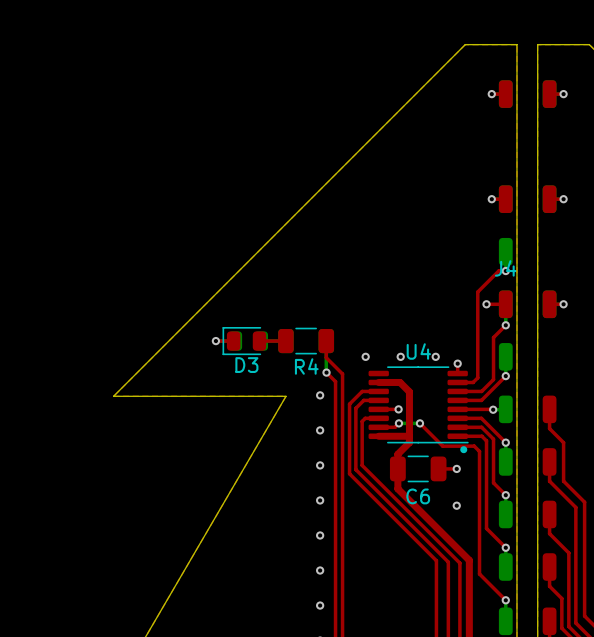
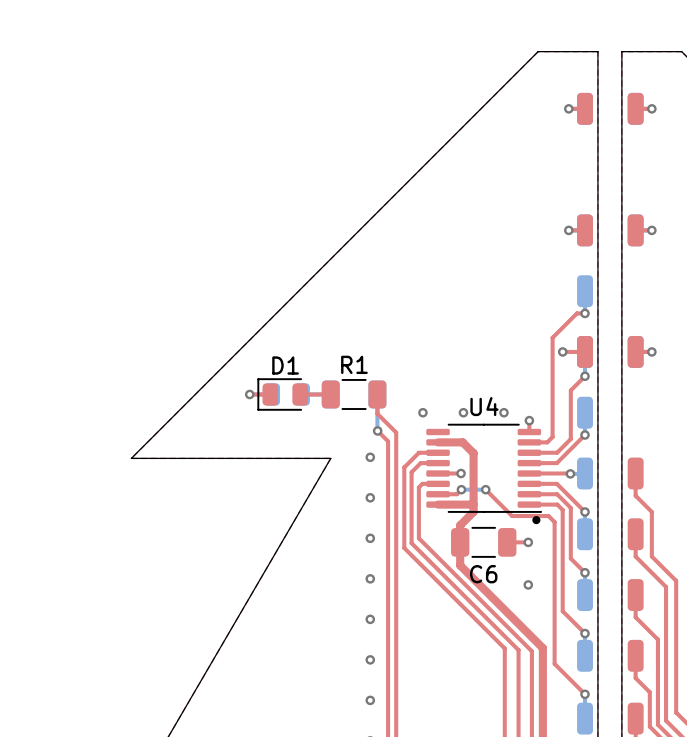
J4 name: J4 (505, 268) -> none
D3 name: D3 (246, 365) -> D1 (285, 365)
R4 name: R4 (306, 366) -> R1 (354, 364)

